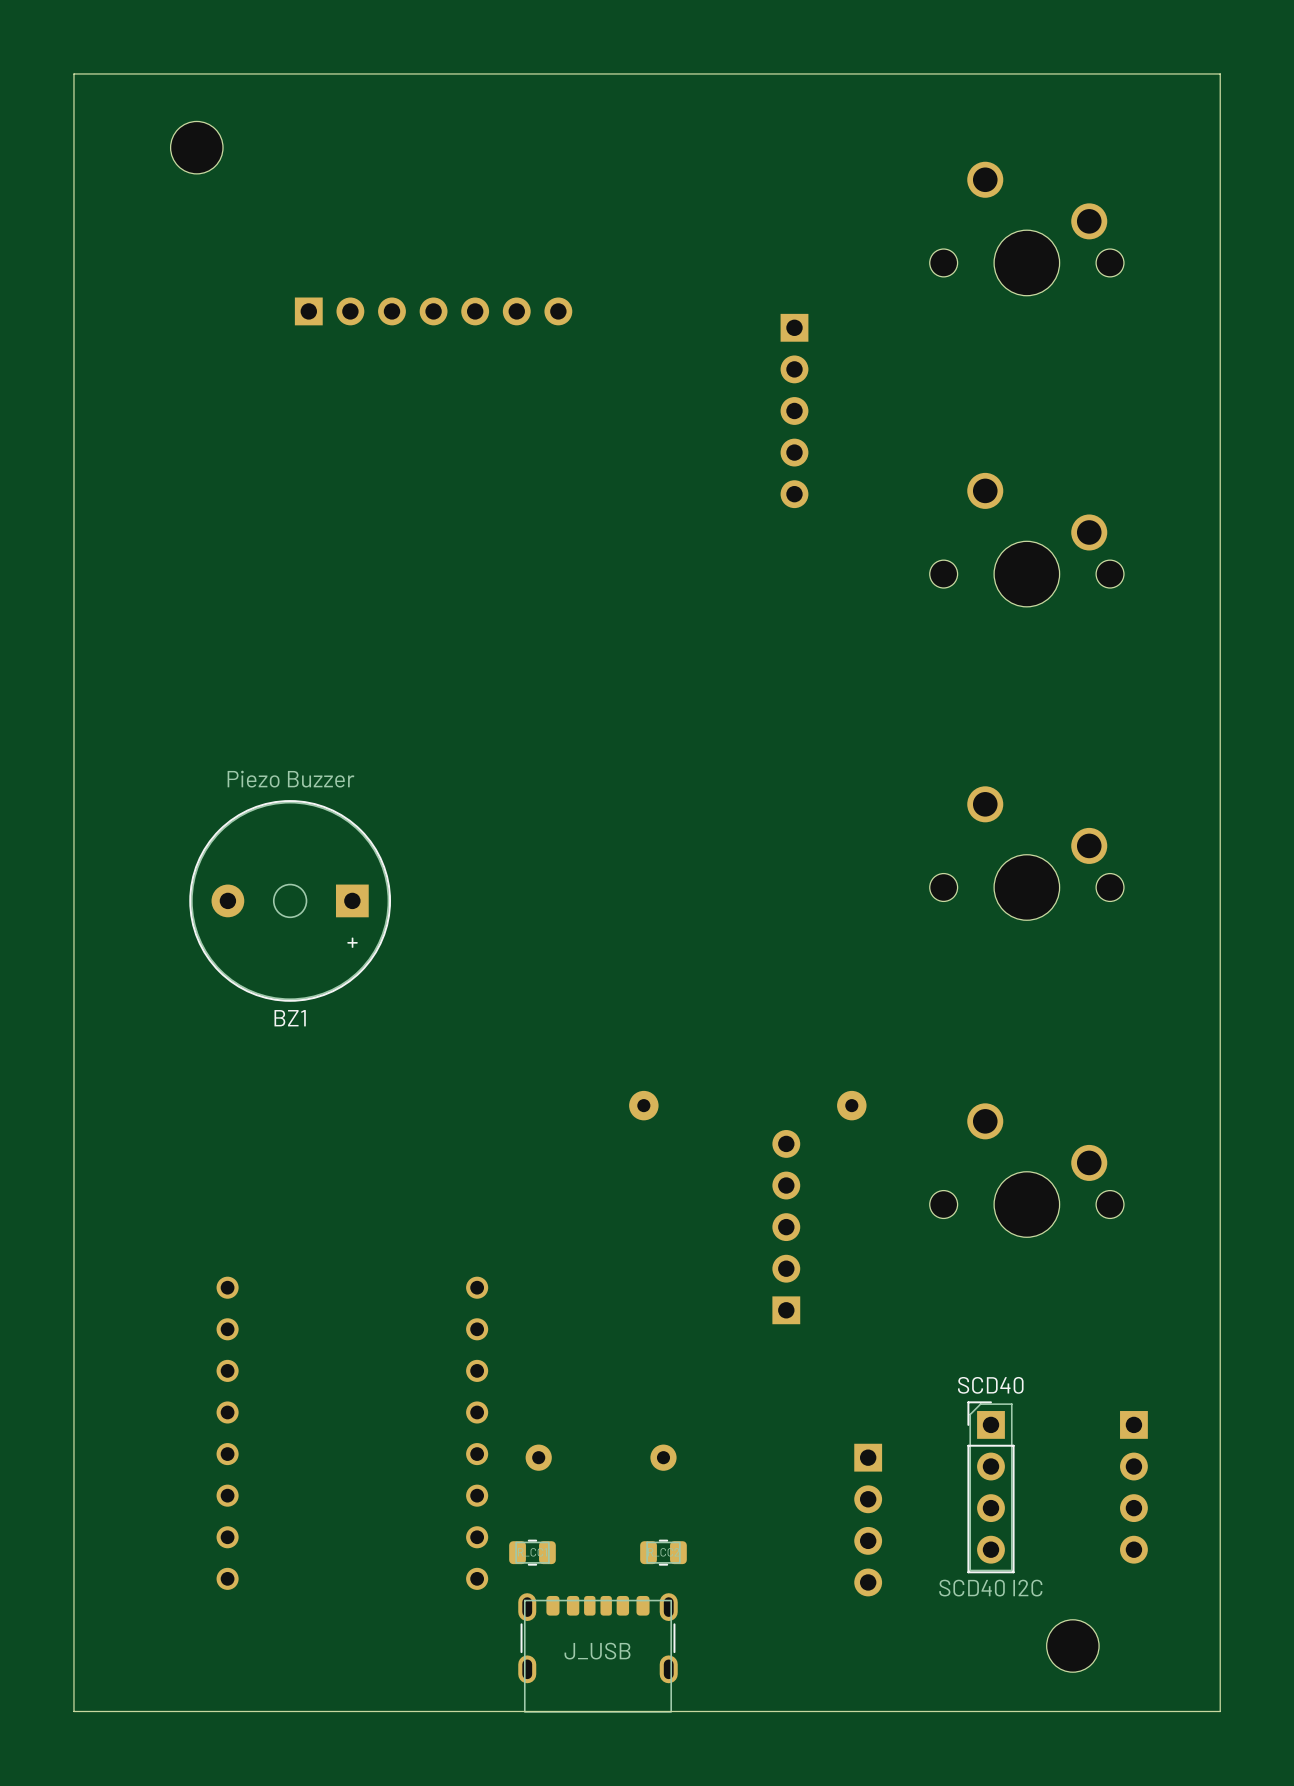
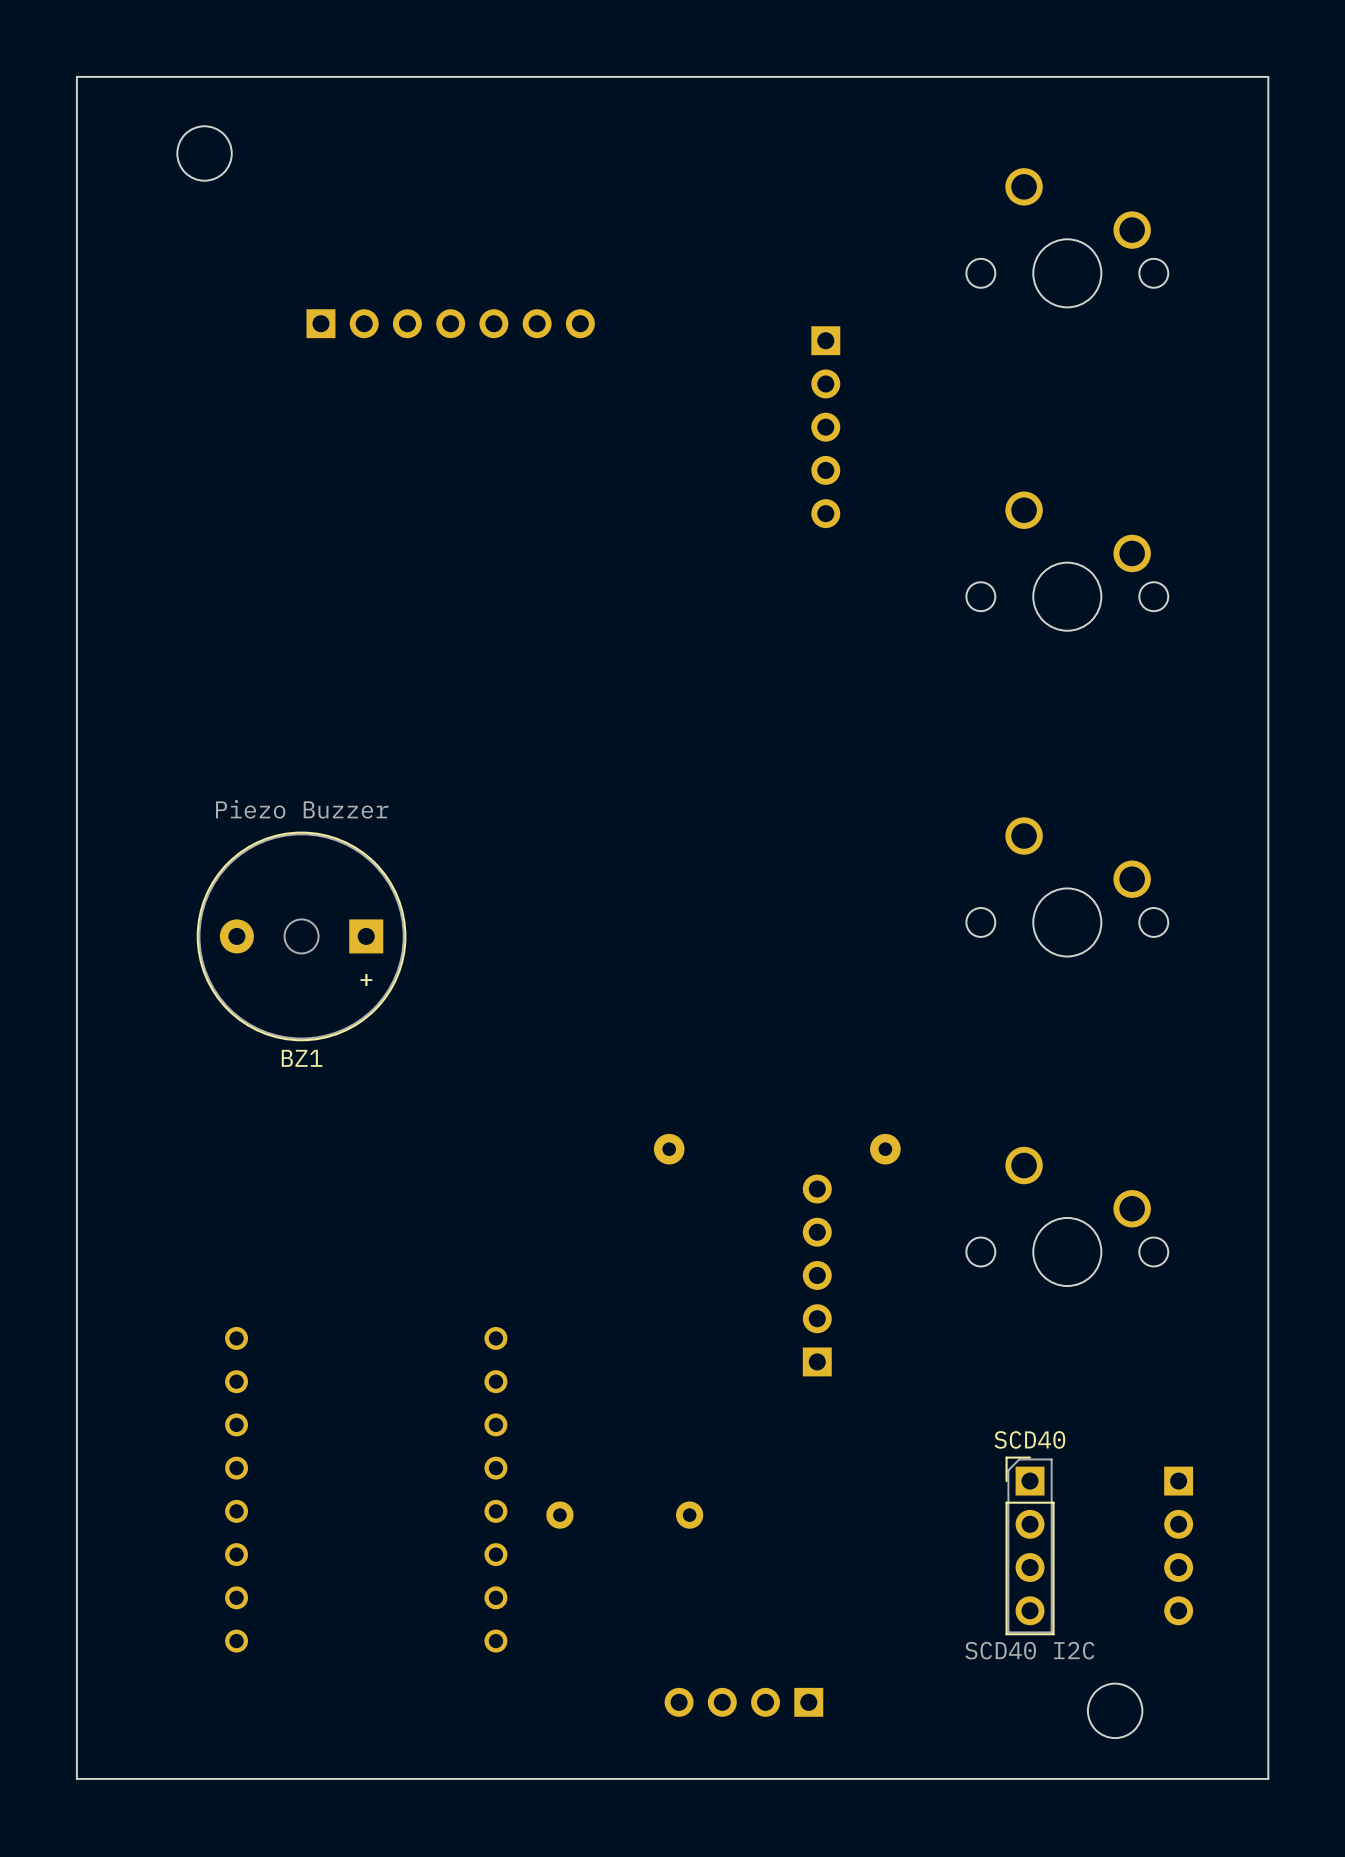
part rotation: 0° (868, 1520) -> 90° clockwise (743, 1702)
part position: (868, 1520) -> (743, 1702)
part: (532, 1552) -> none
part: (663, 1552) -> none
J_USB: (597, 1652) -> none

